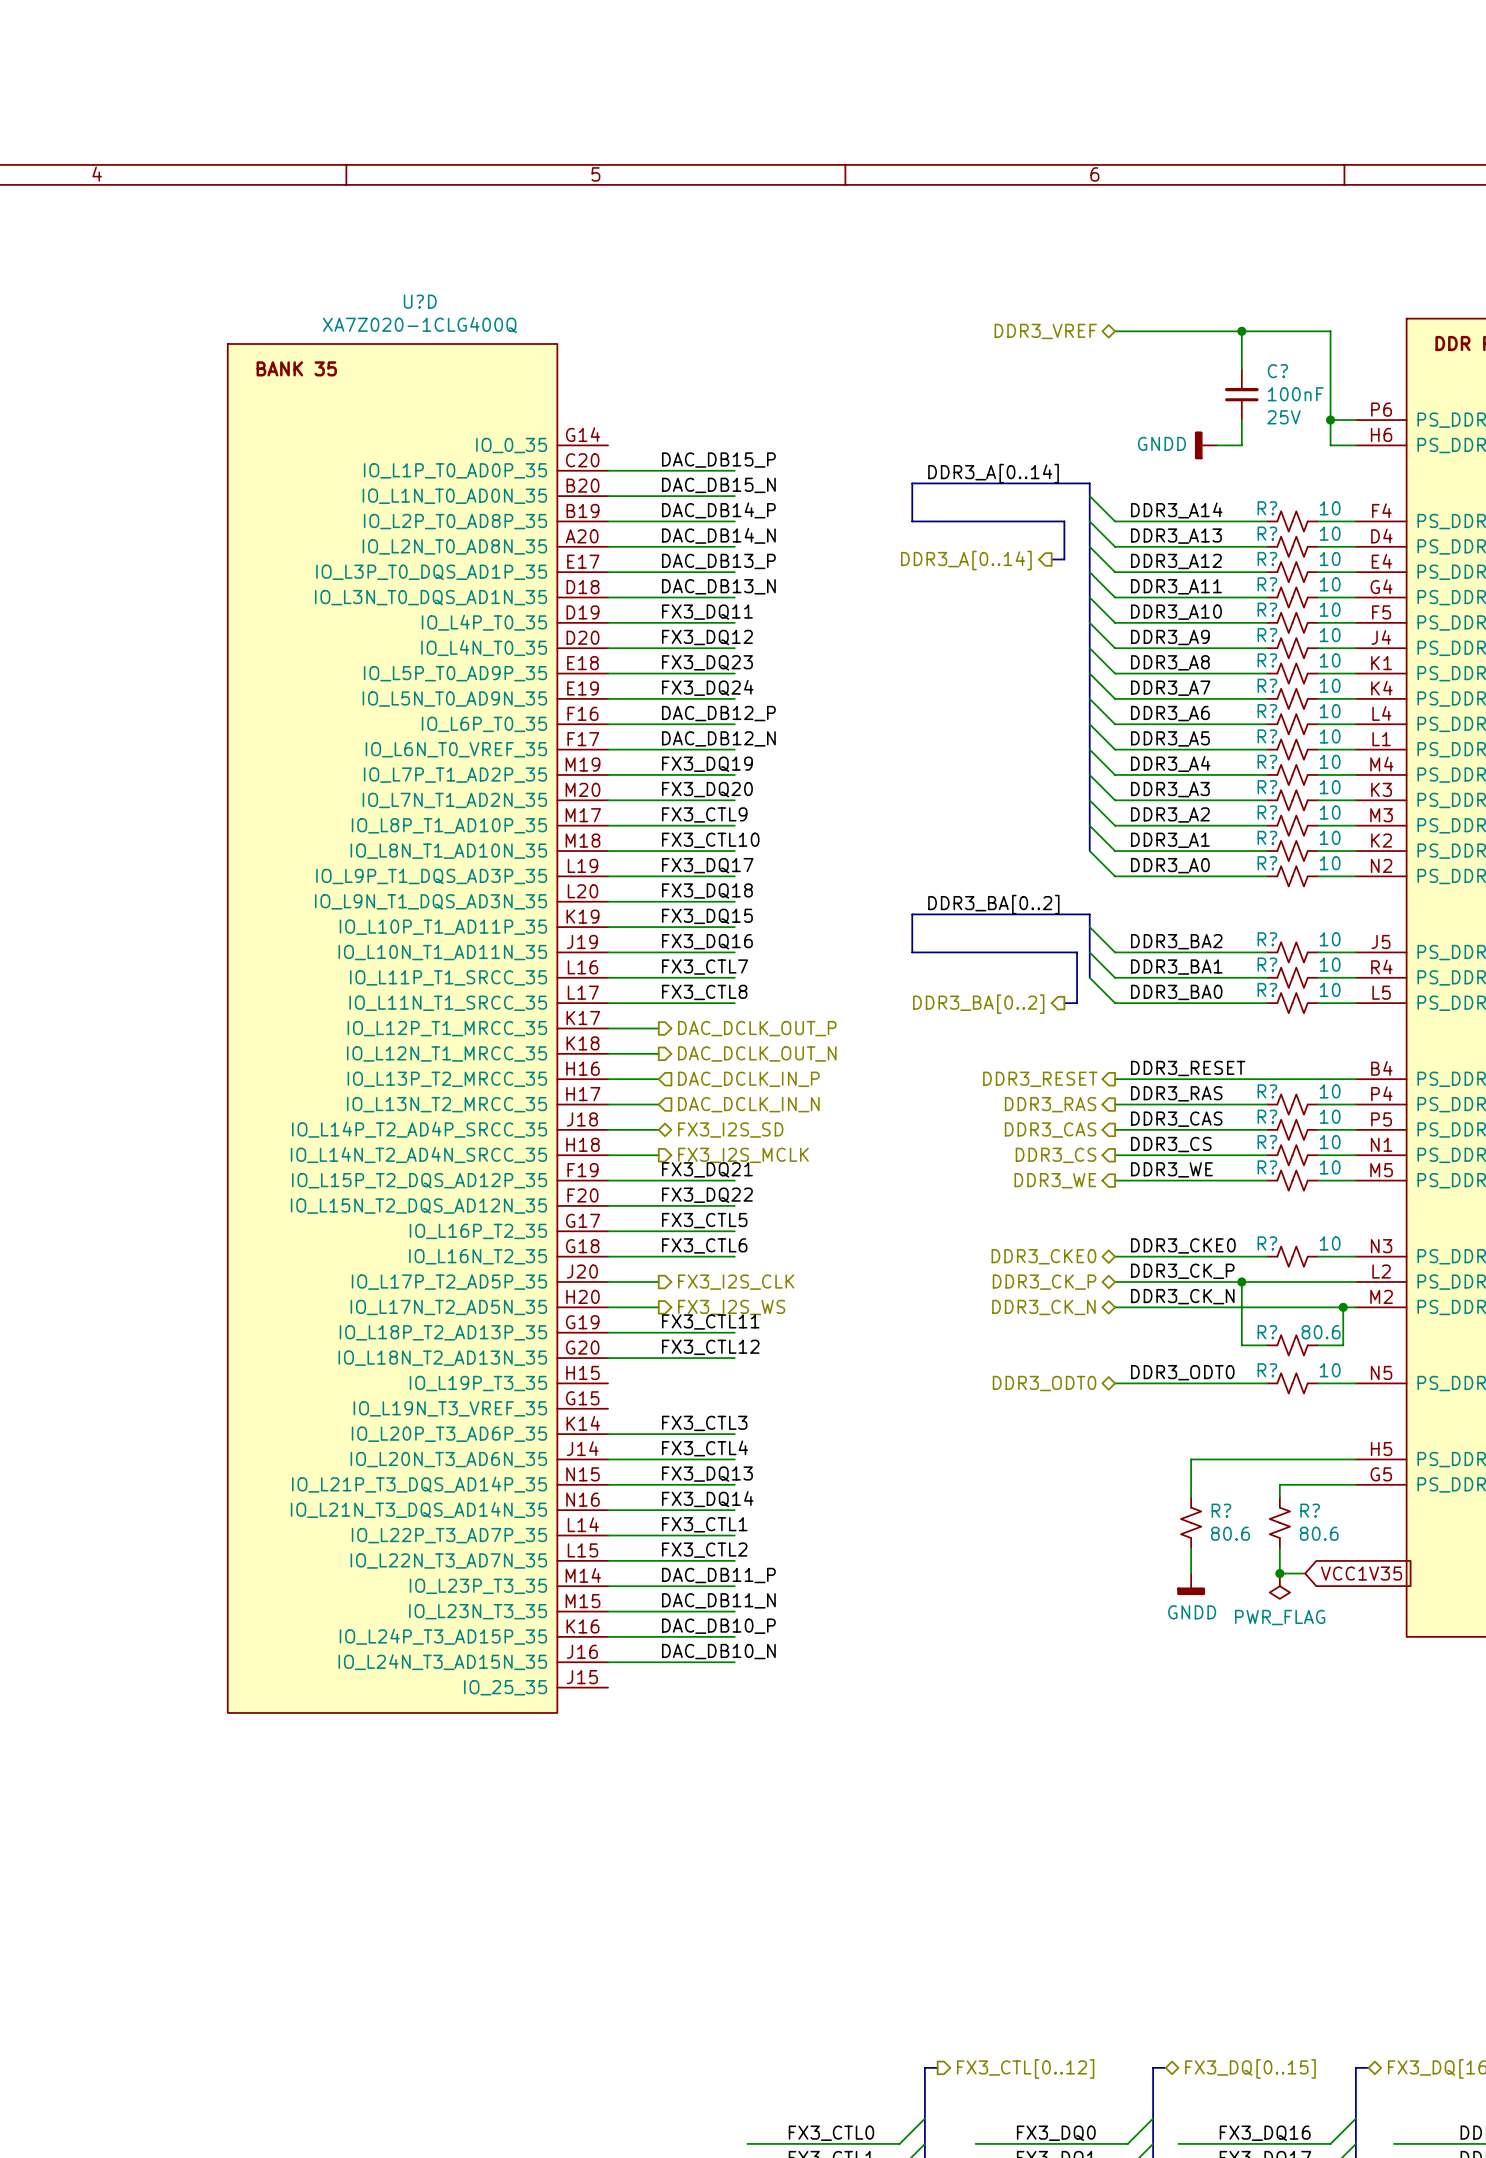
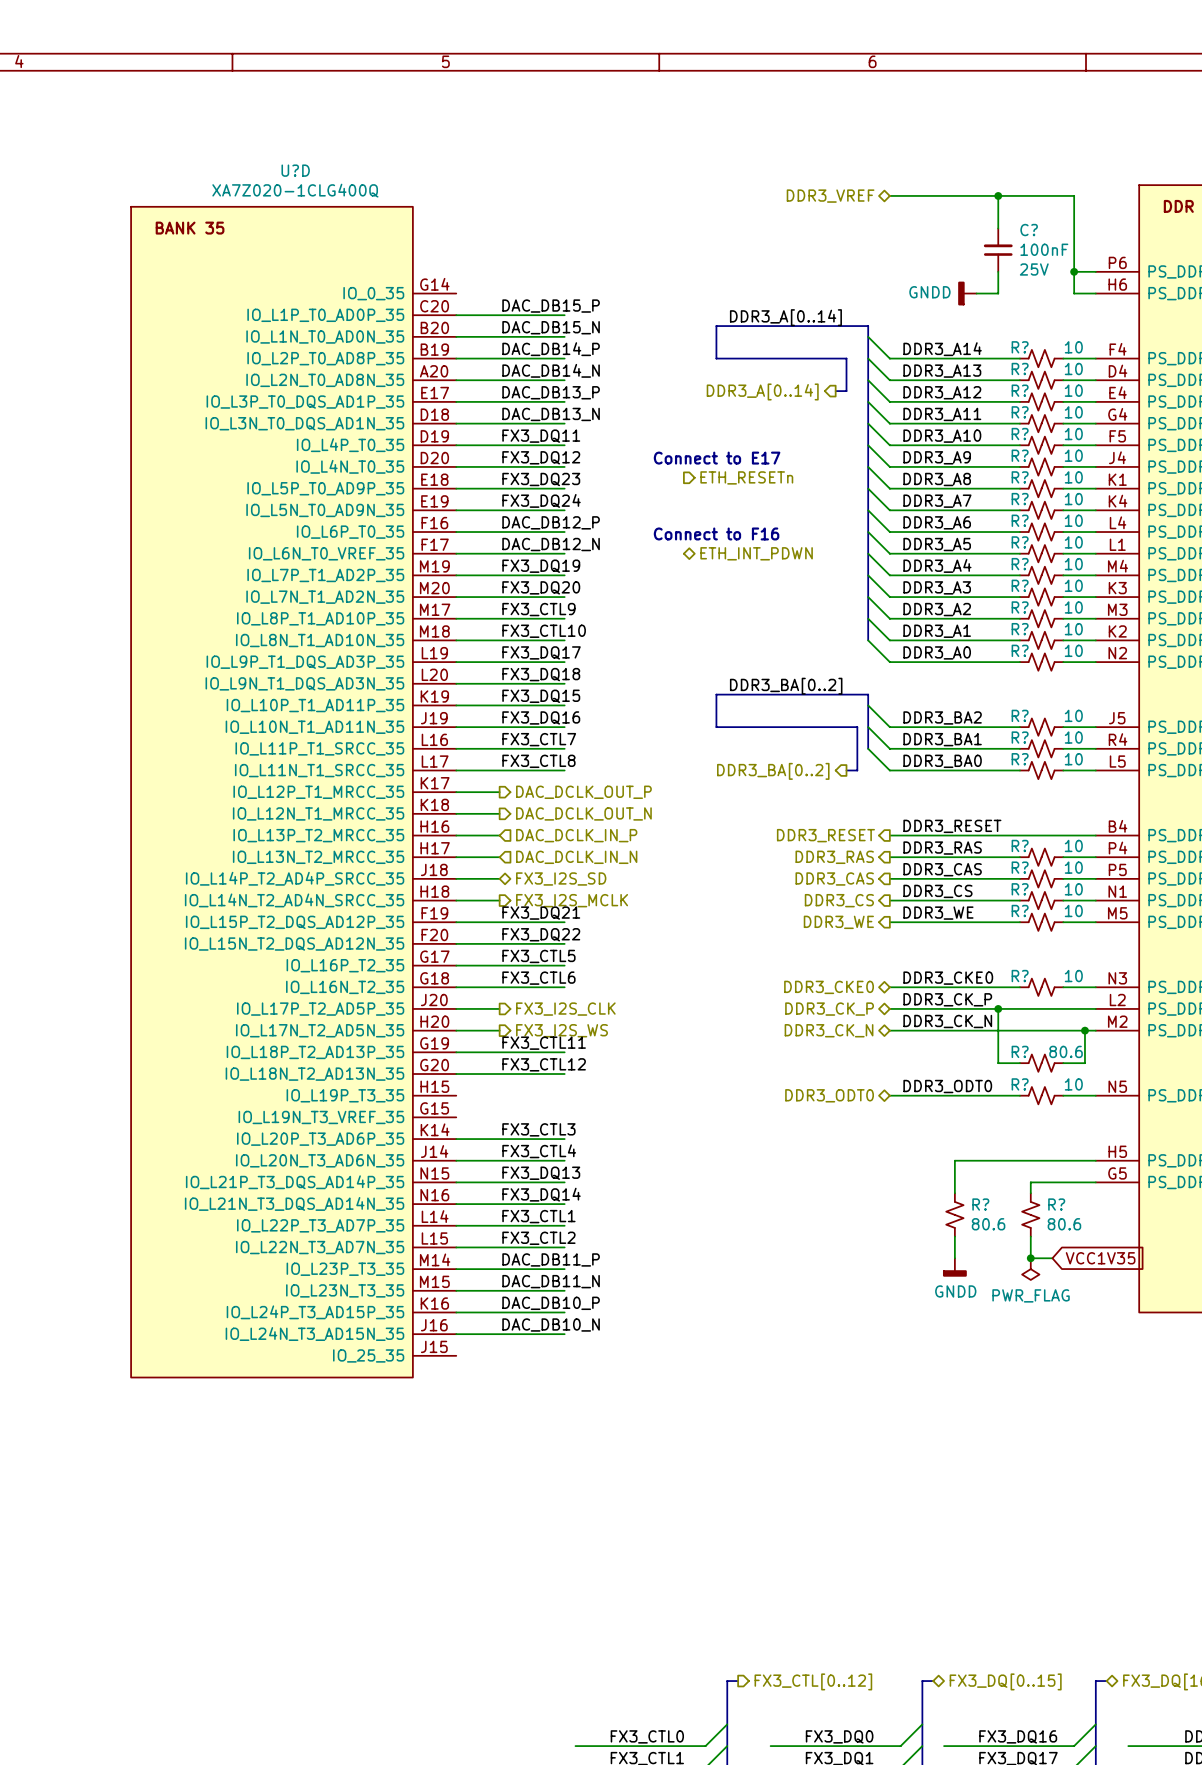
text: none -> Connect to E17 (717, 458)
hierarchical label: none -> ETH_RESETn (746, 477)
text: none -> Connect to F16 (716, 533)
hierarchical label: none -> ETH_INT_PDWN (756, 553)

